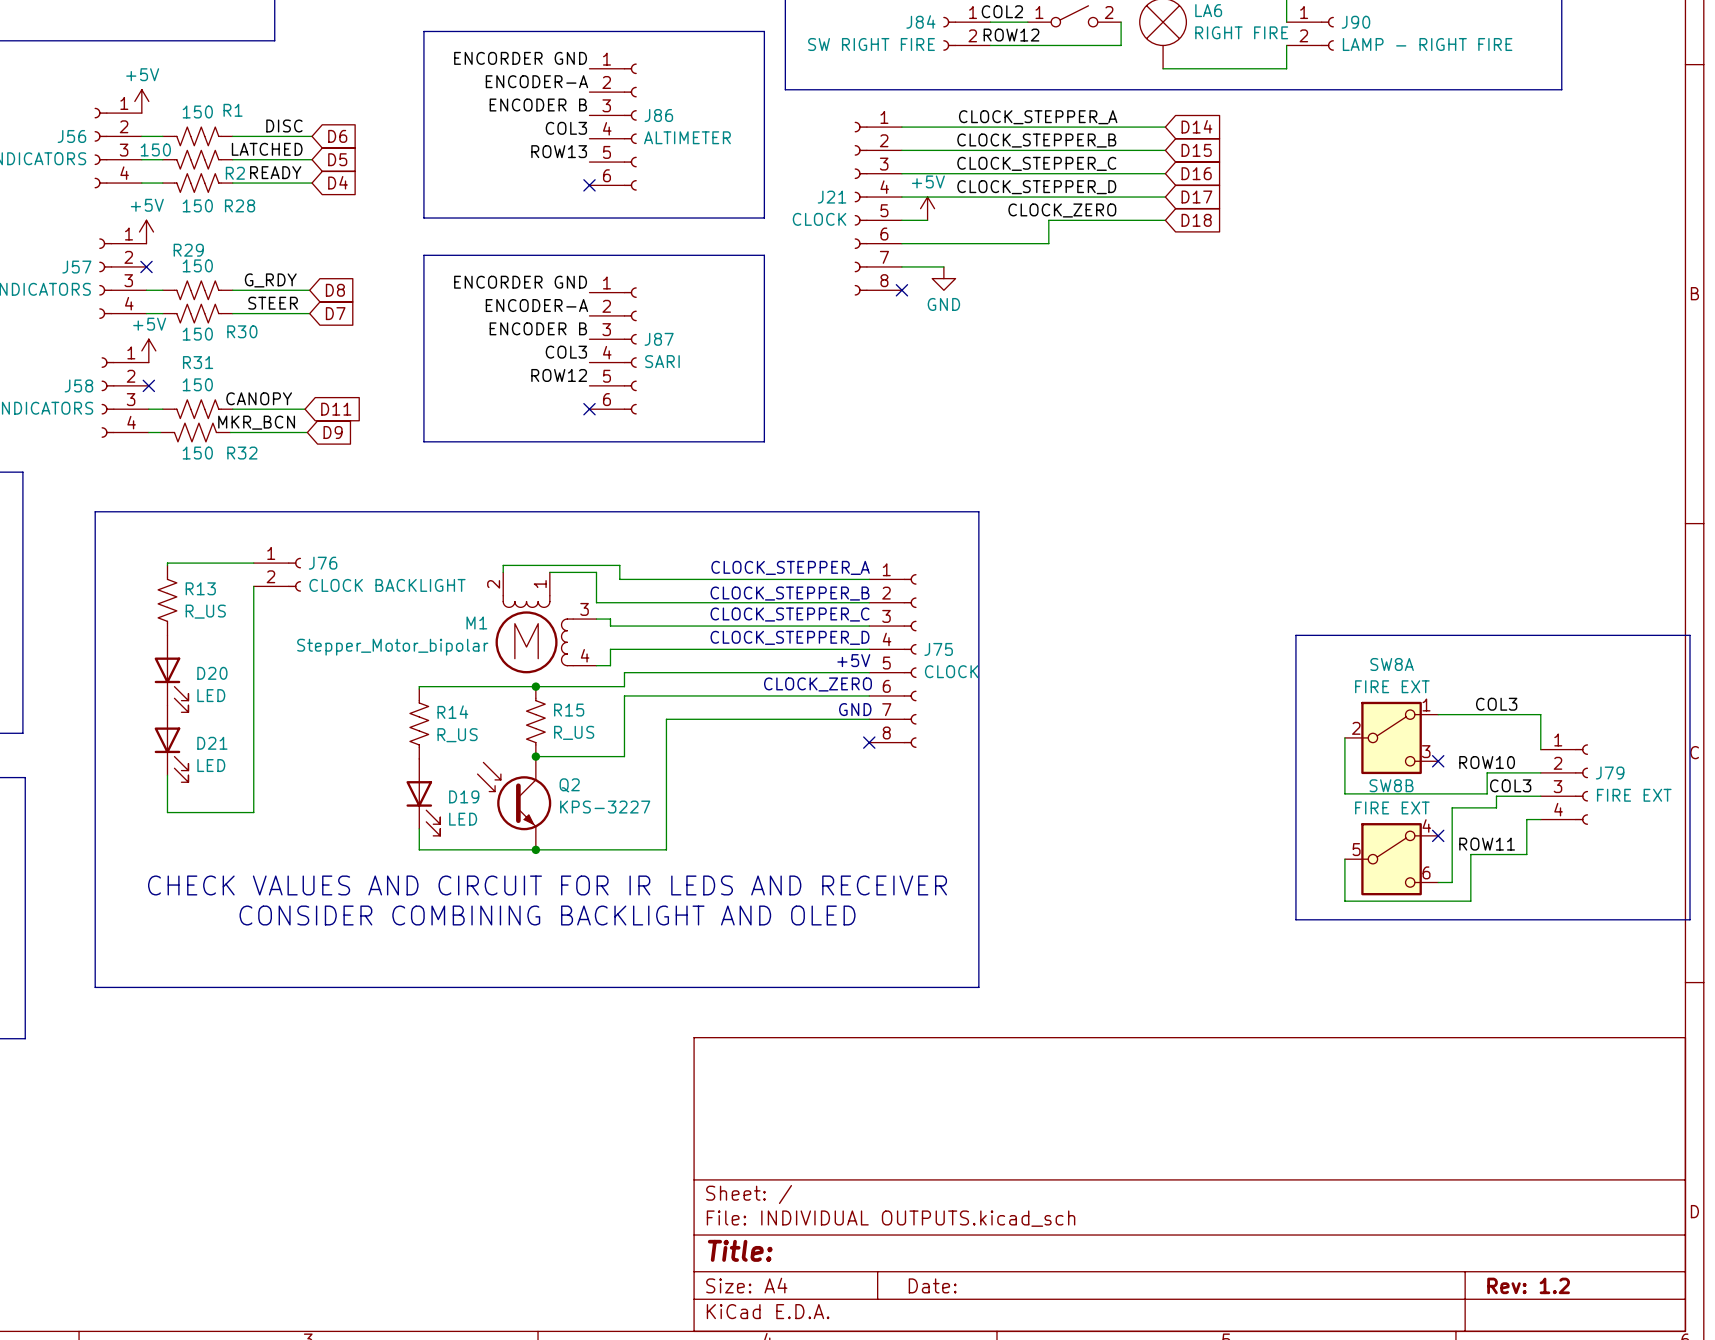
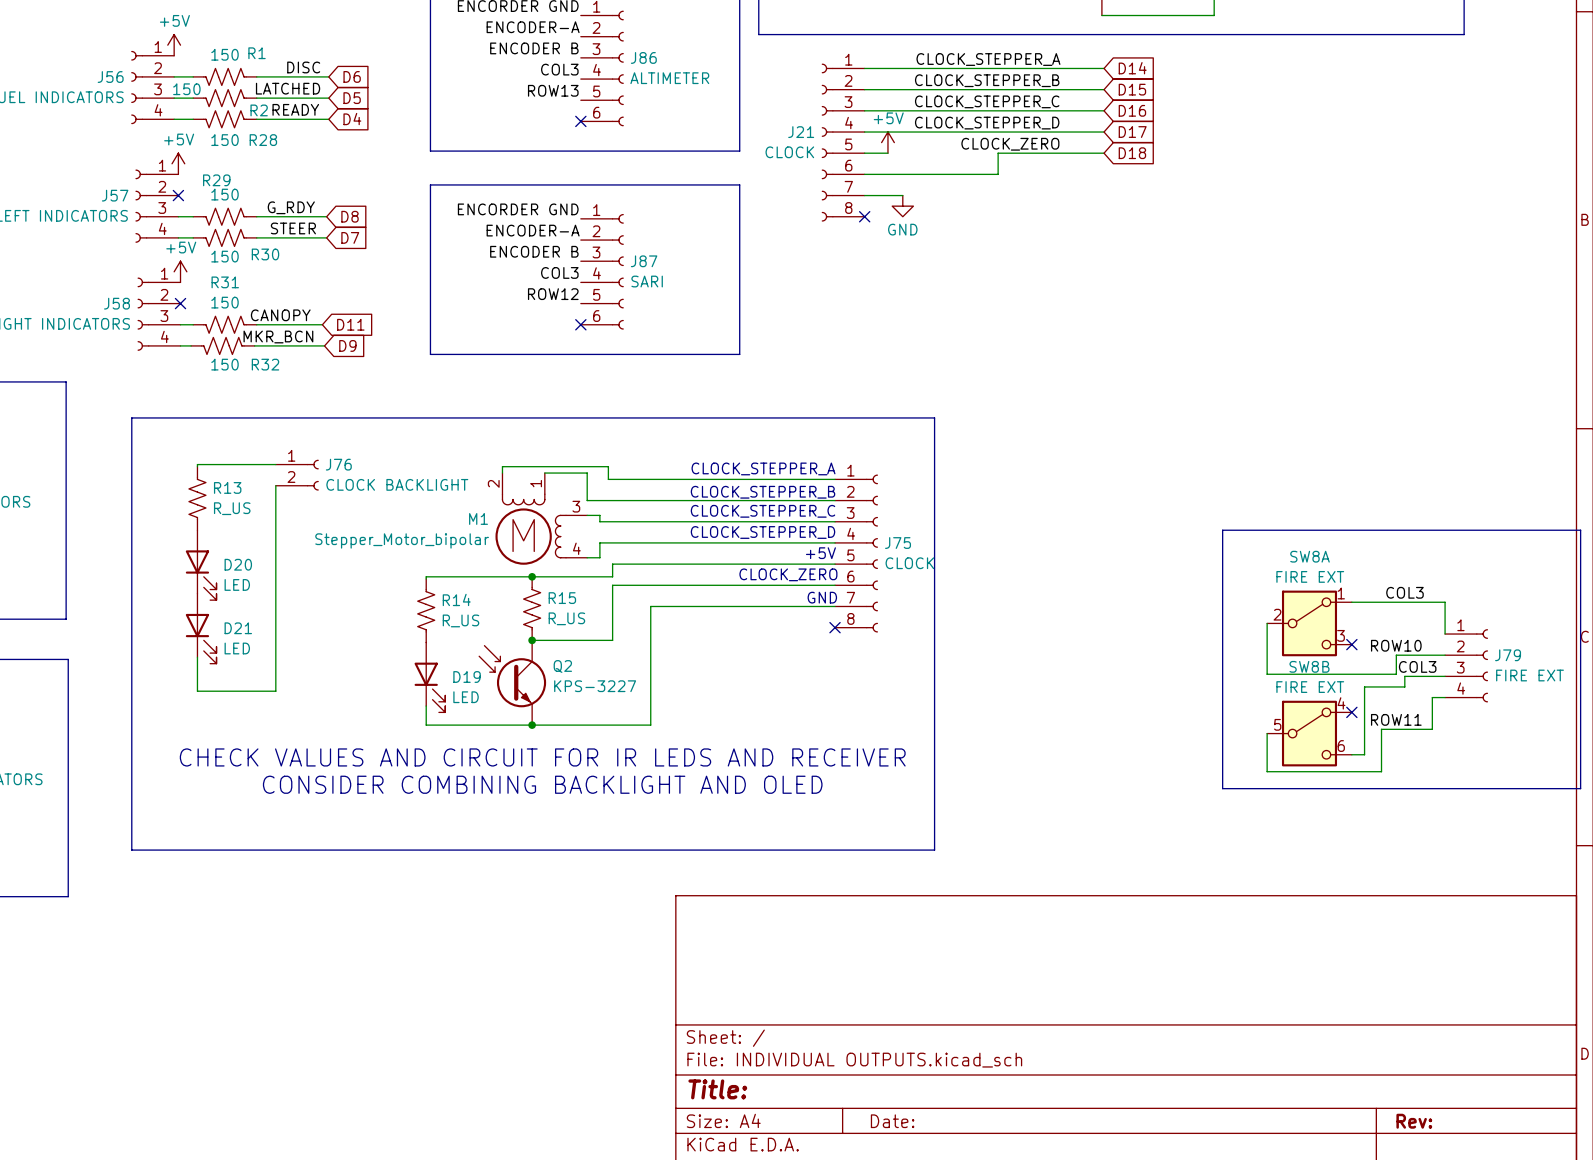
title block: Rev: 1.2 (1528, 1285) -> Rev: (1414, 1121)

